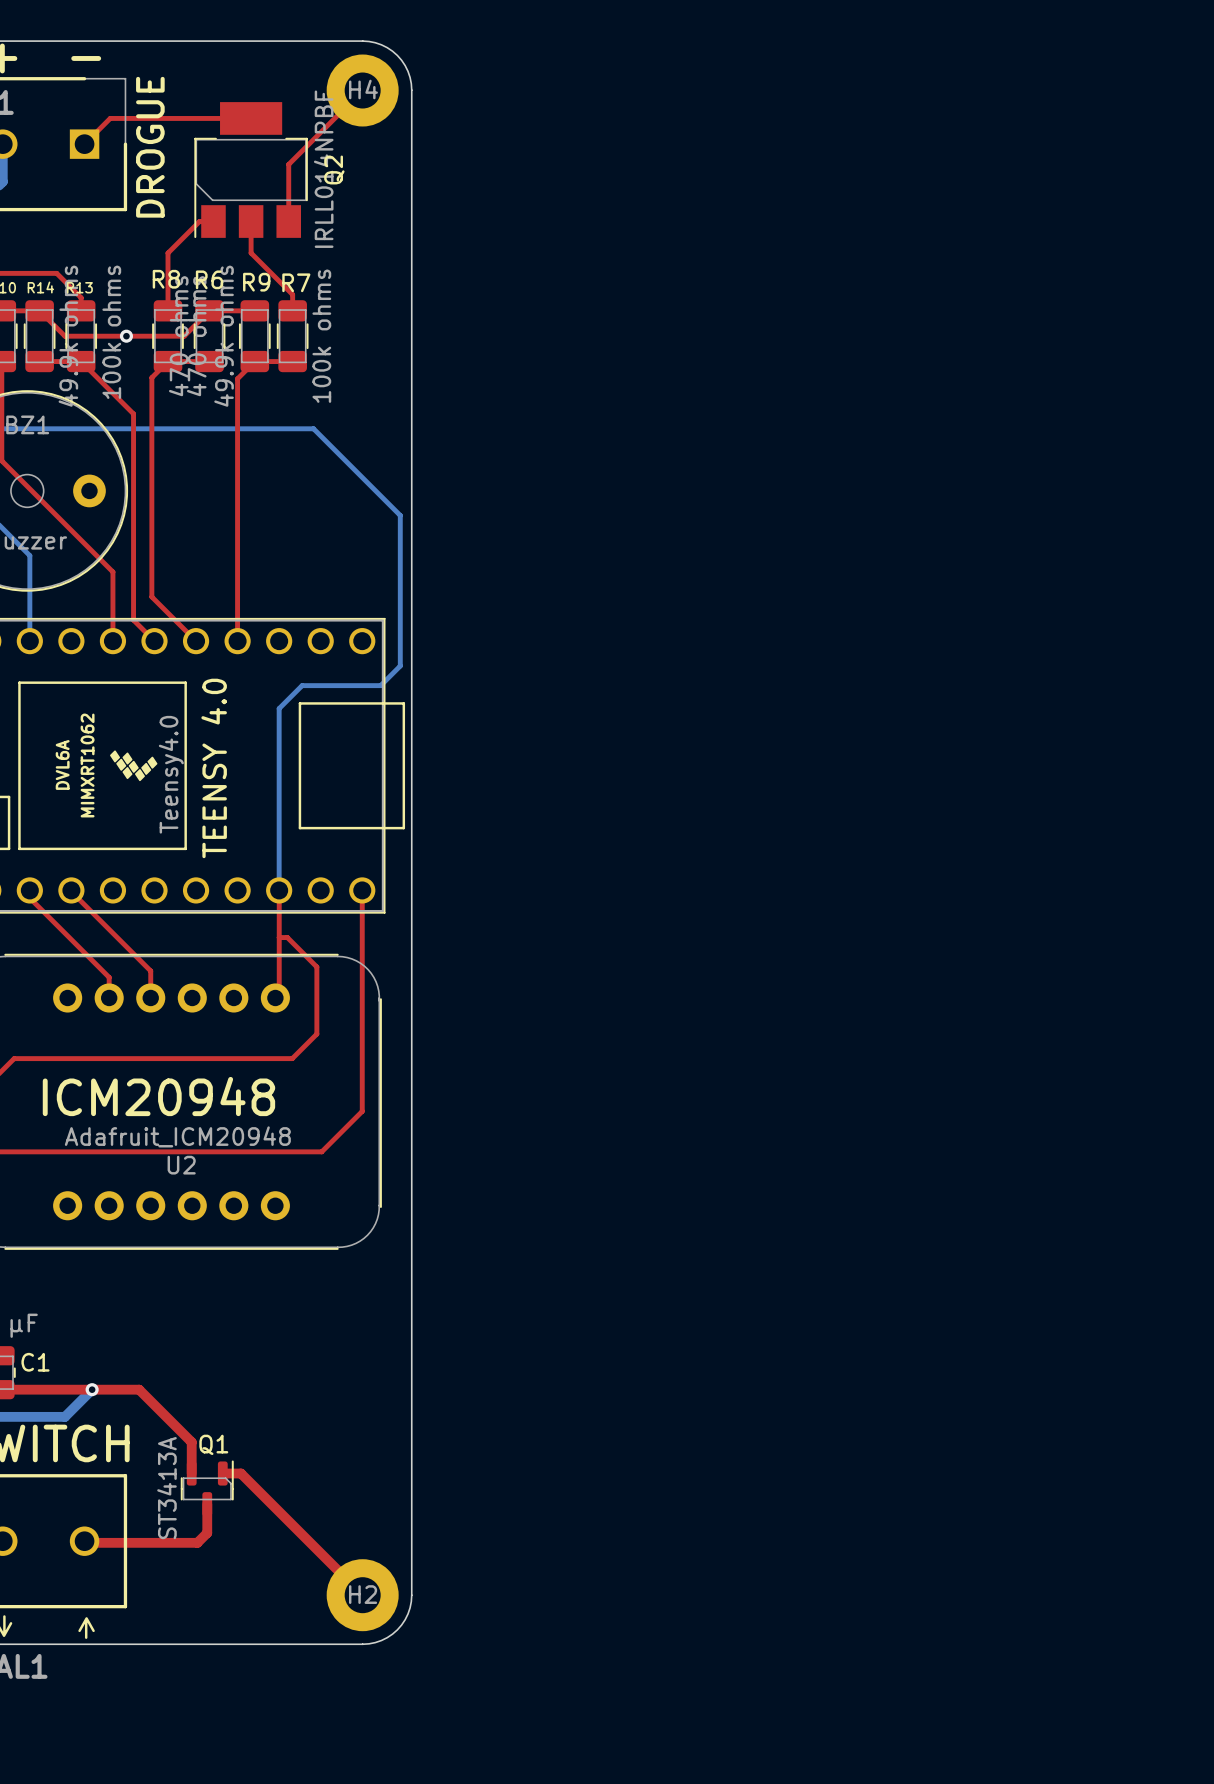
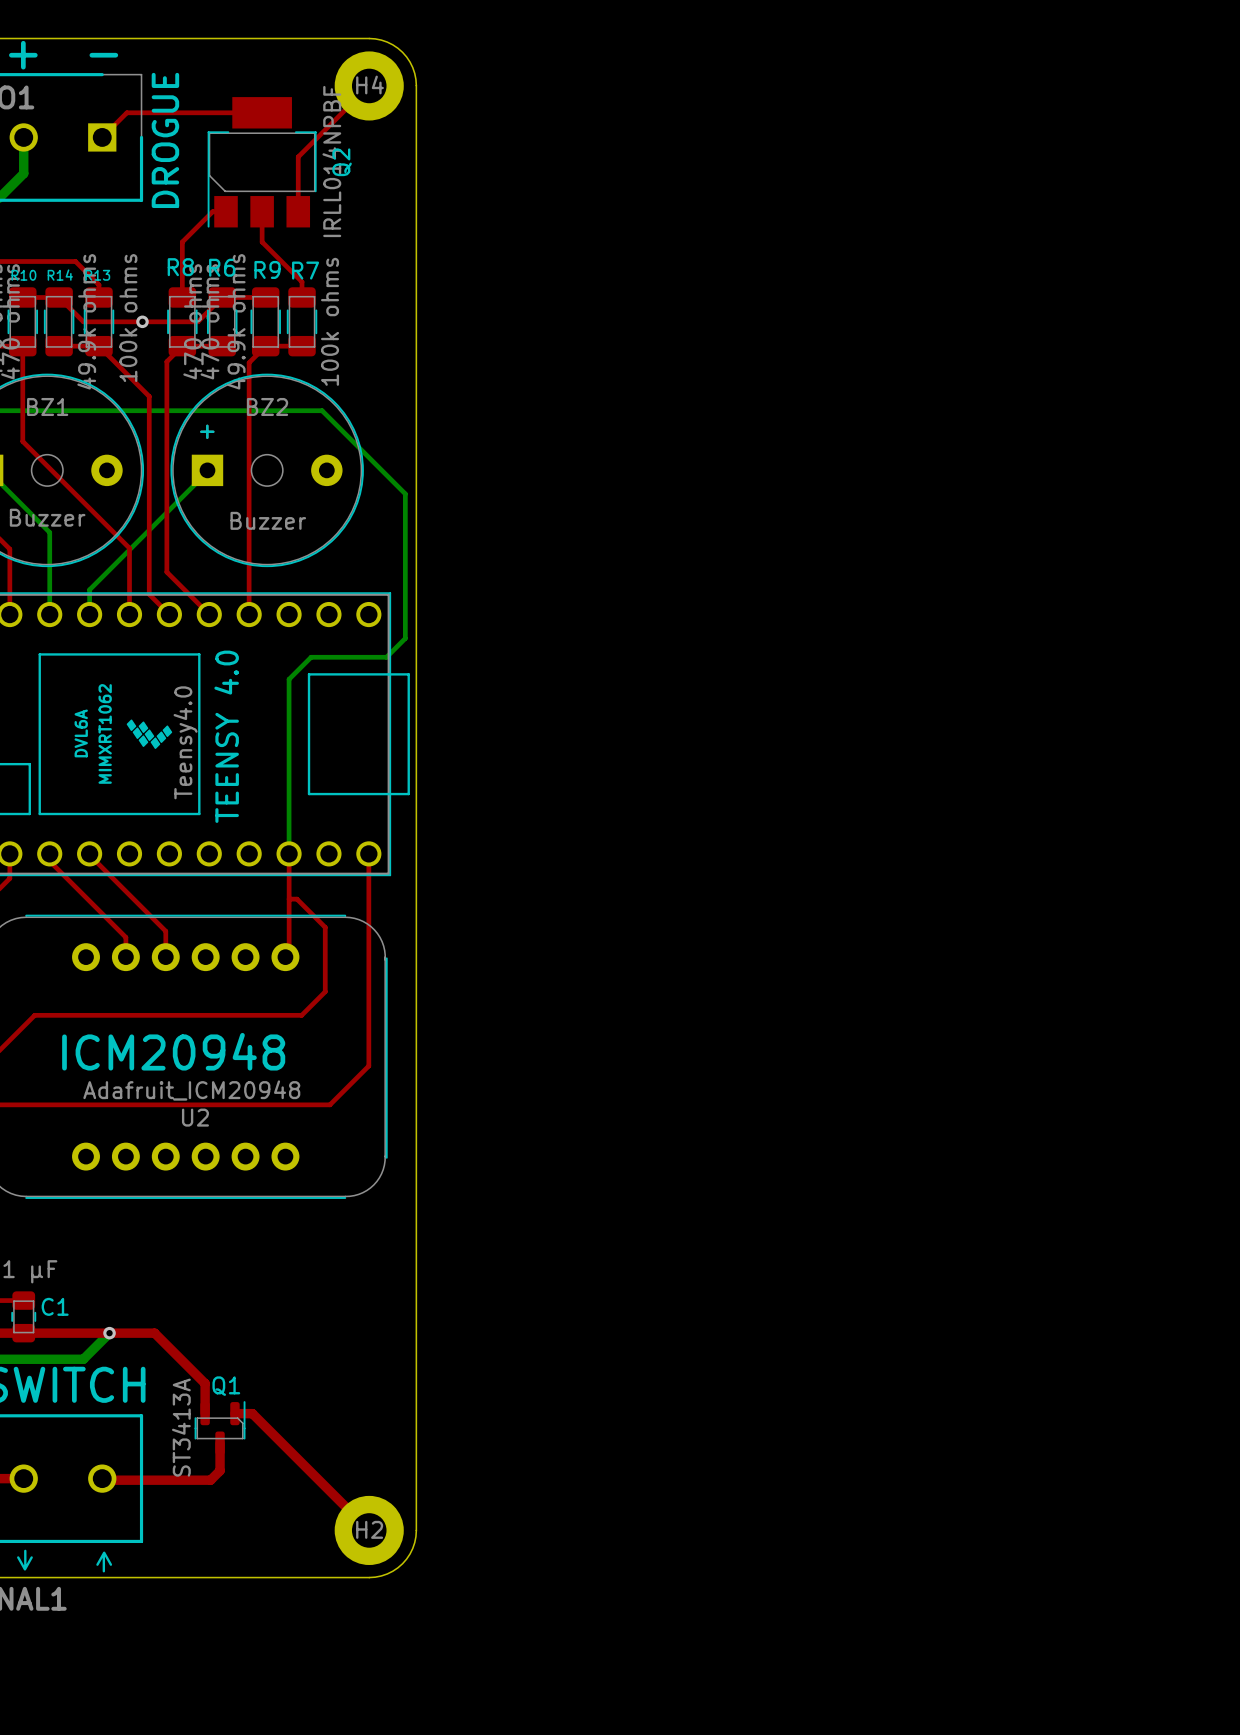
BZ2: none -> Buzzer (267, 470)
bottom track: none -> (207, 471) (89, 589) (89, 614)

